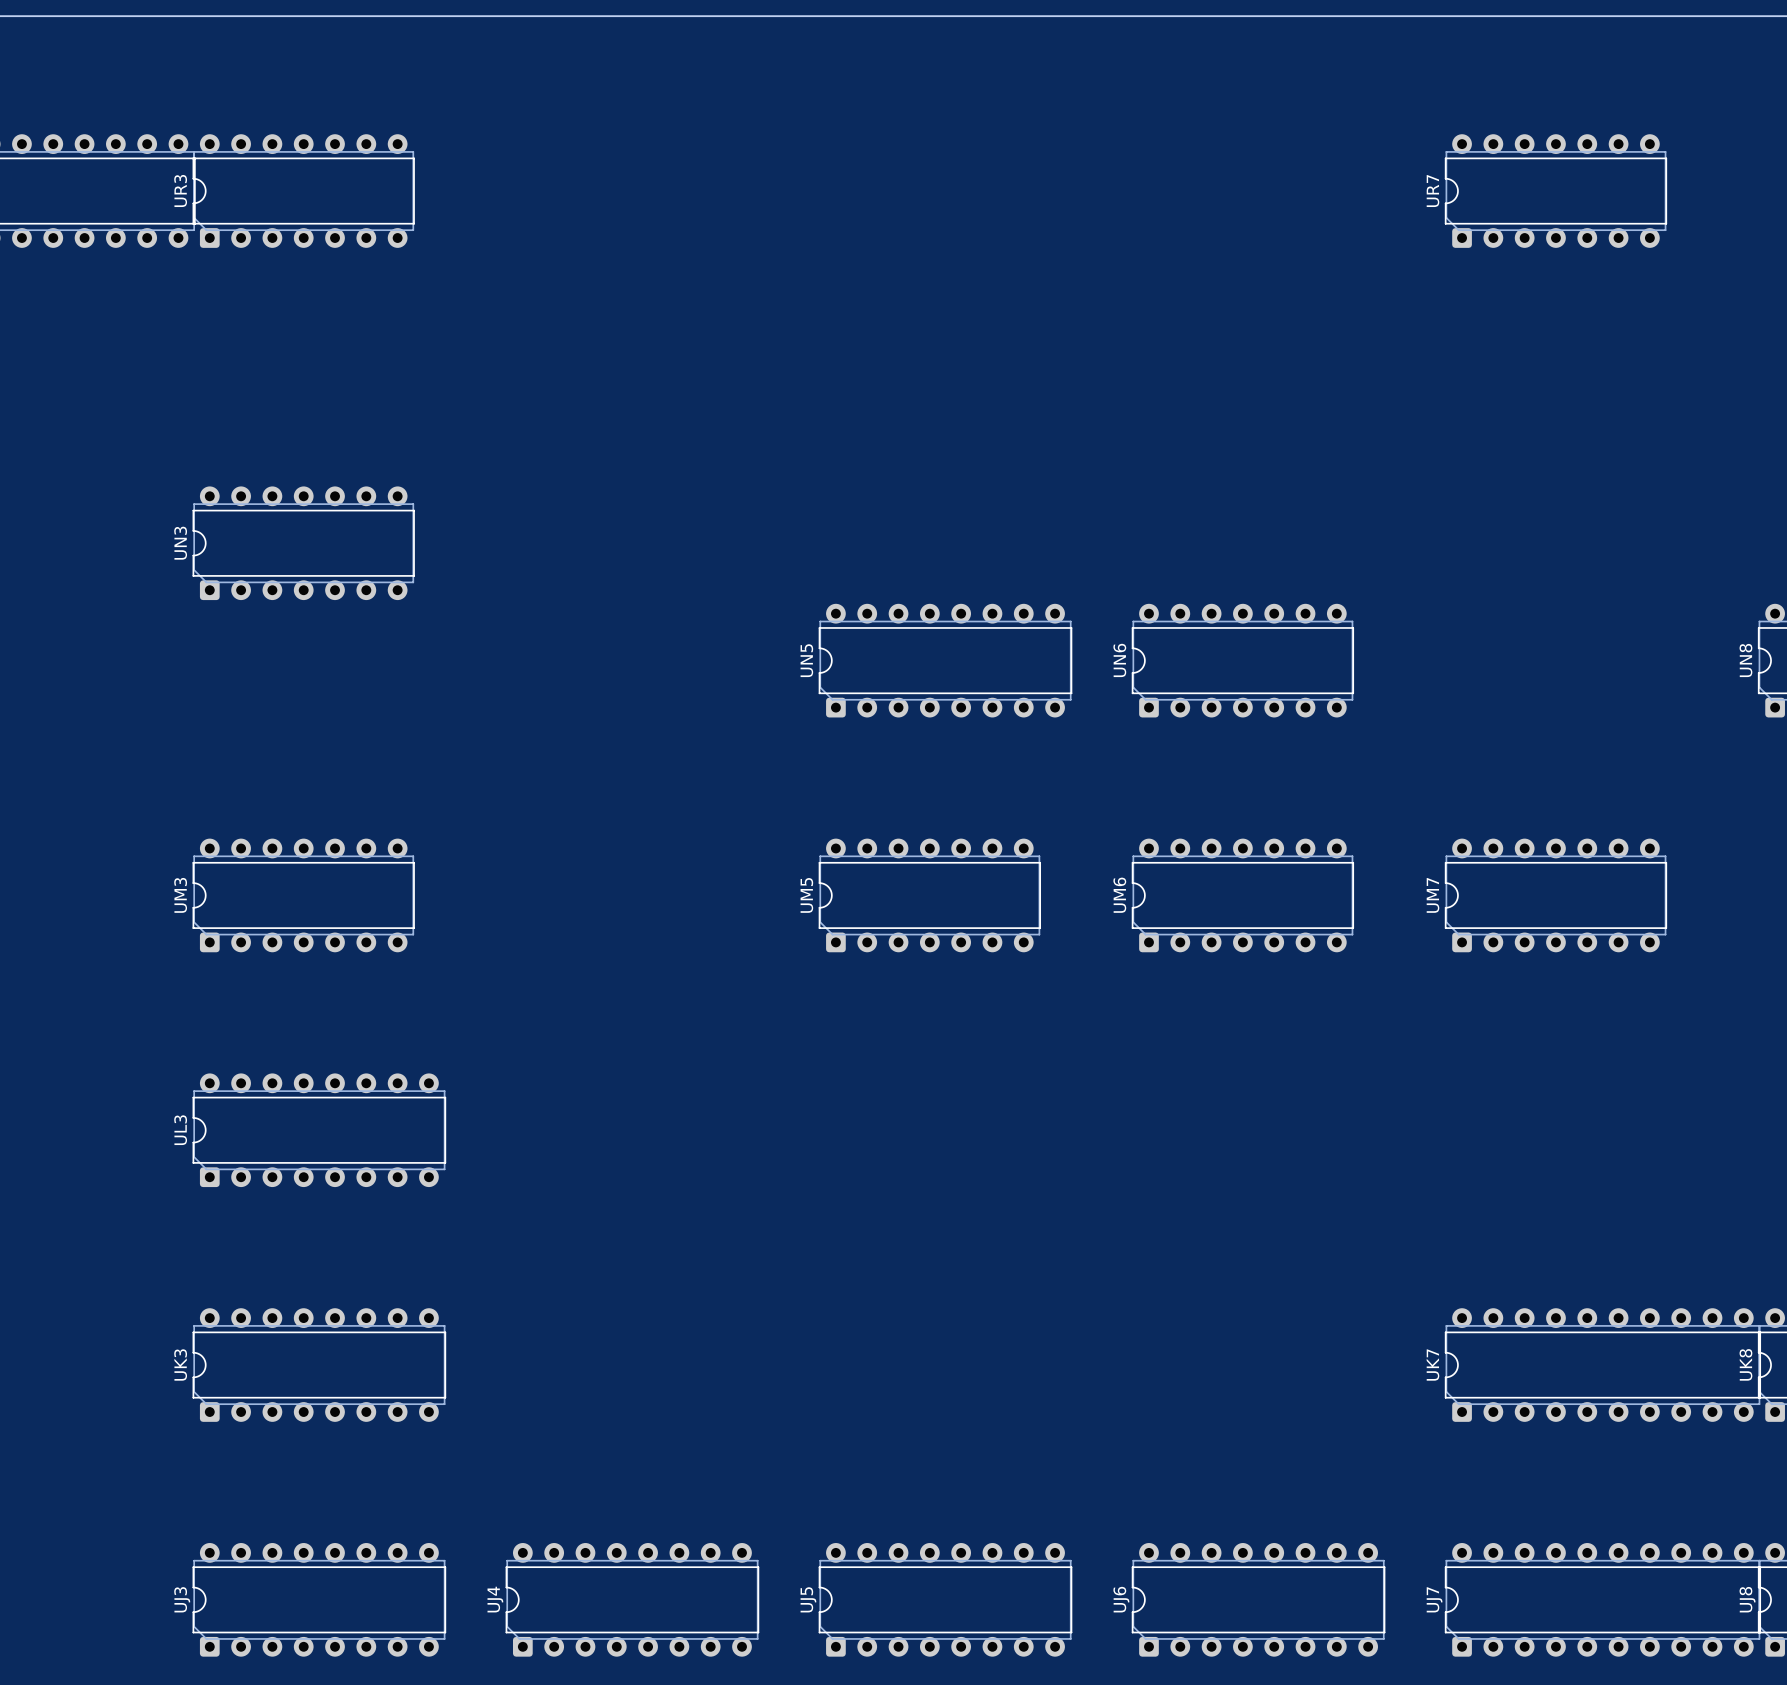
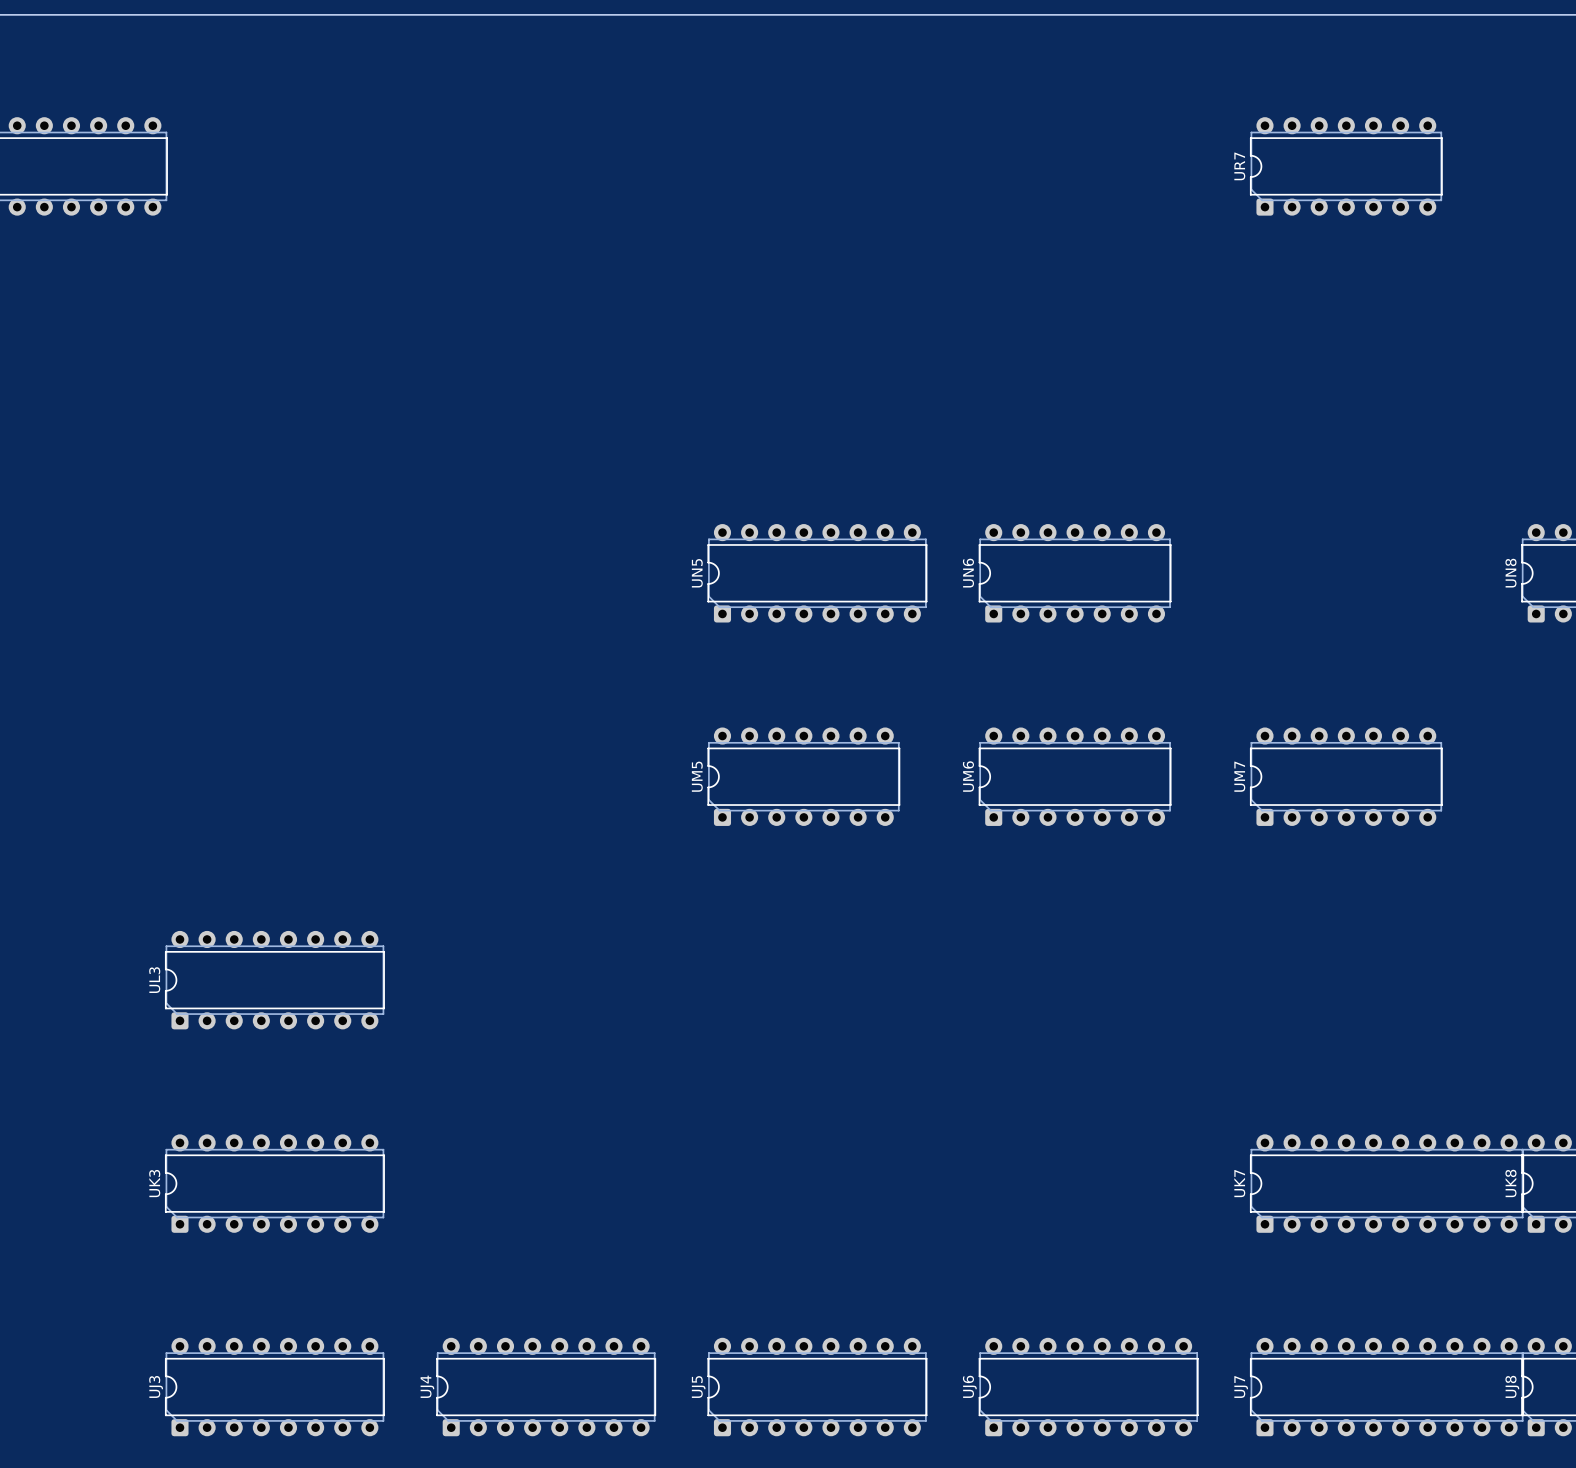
UR3: (303, 191) -> none
UN3: (303, 543) -> none
UM3: (303, 895) -> none

